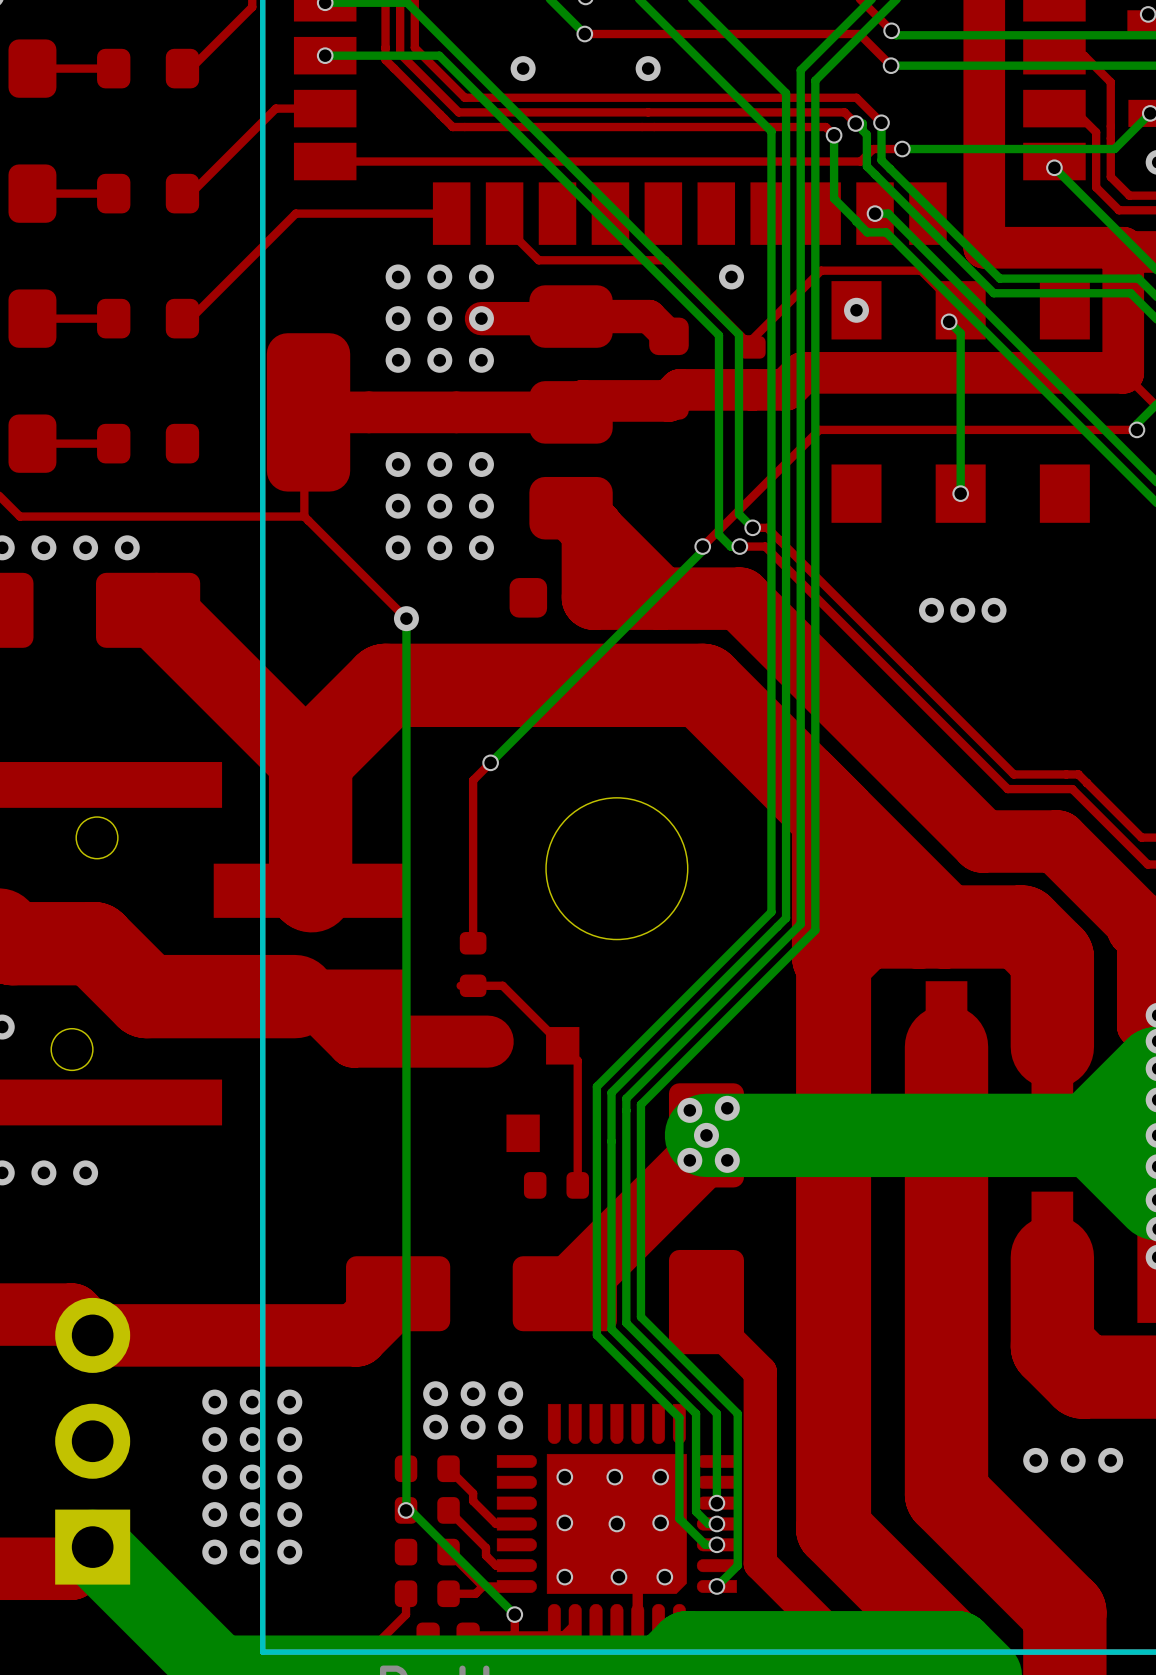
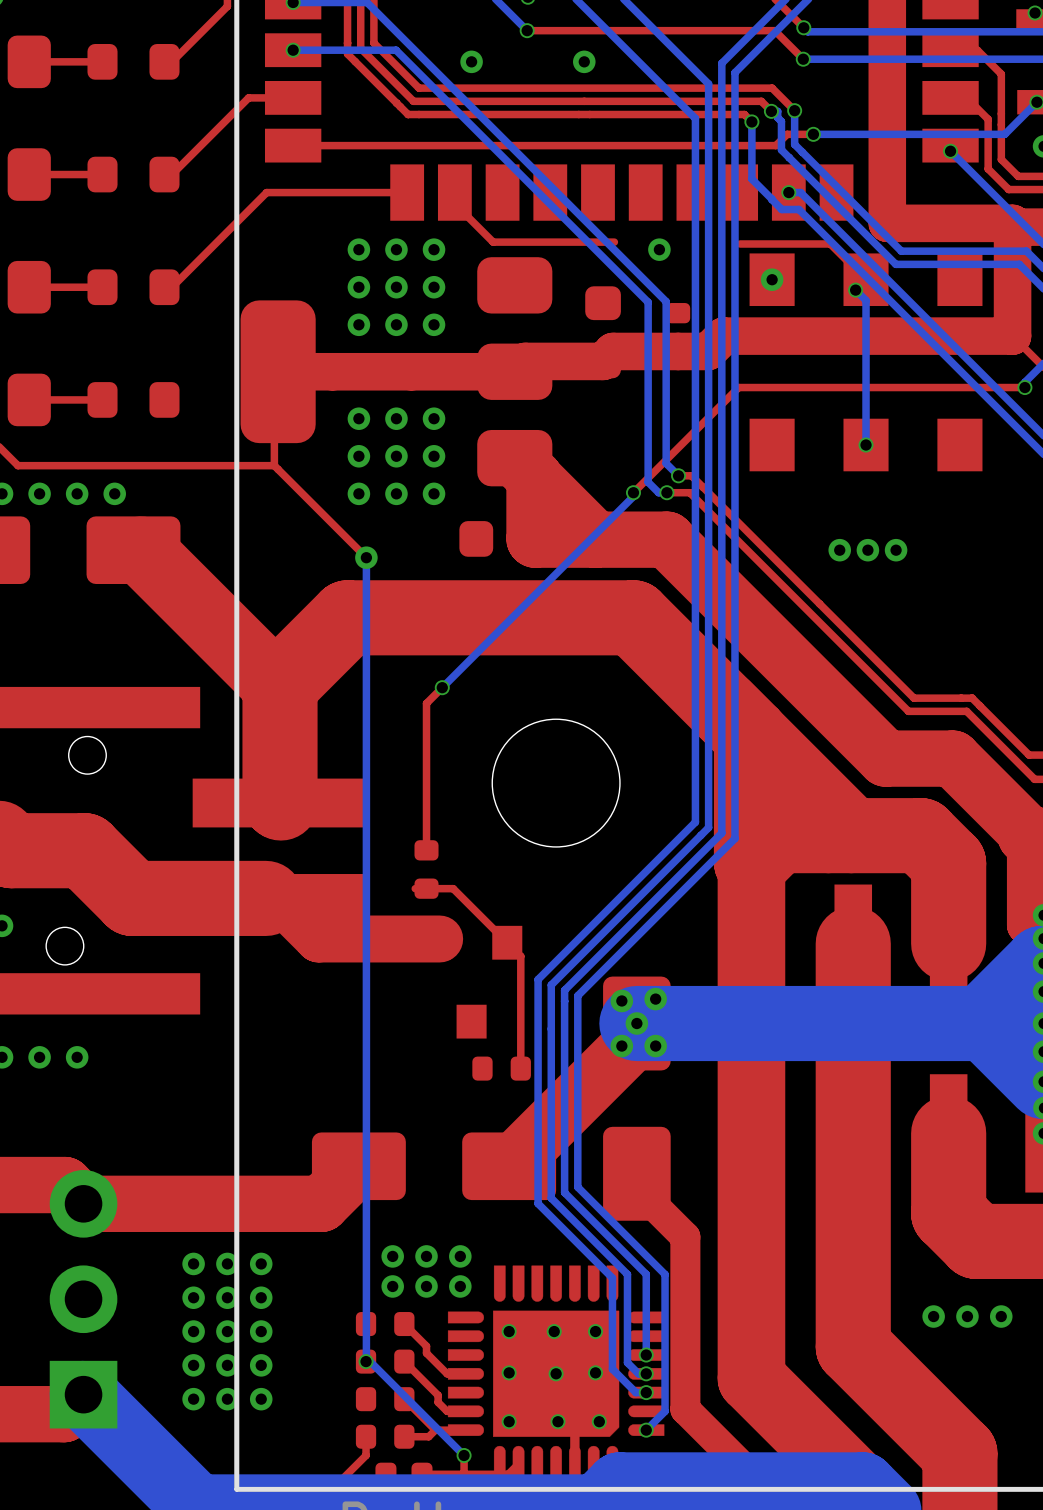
top track: (538, 260) (665, 260) (744, 339) (752, 339) -> (485, 234) (493, 242) (614, 242)
top track: (821, 270) (752, 339) -> none
top track: (481, 318) (649, 316) (668, 336) -> none

